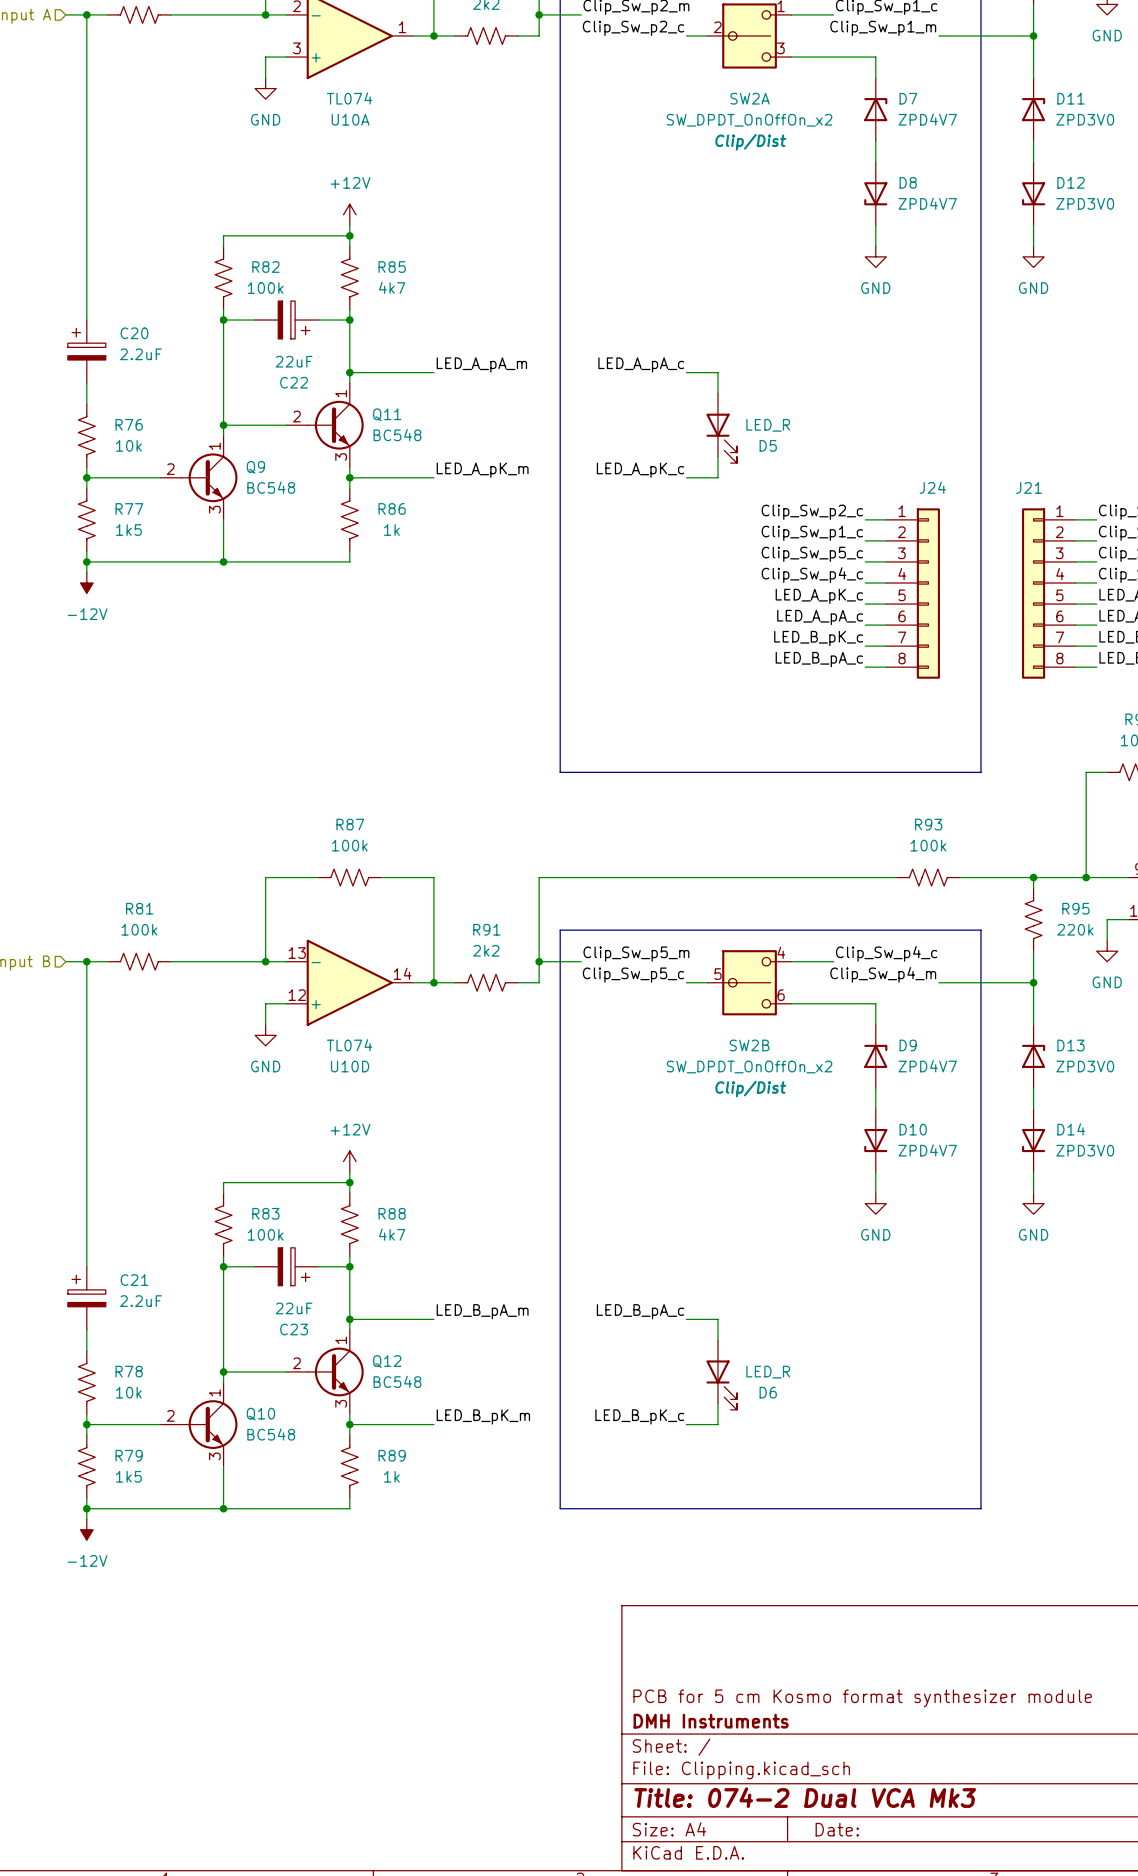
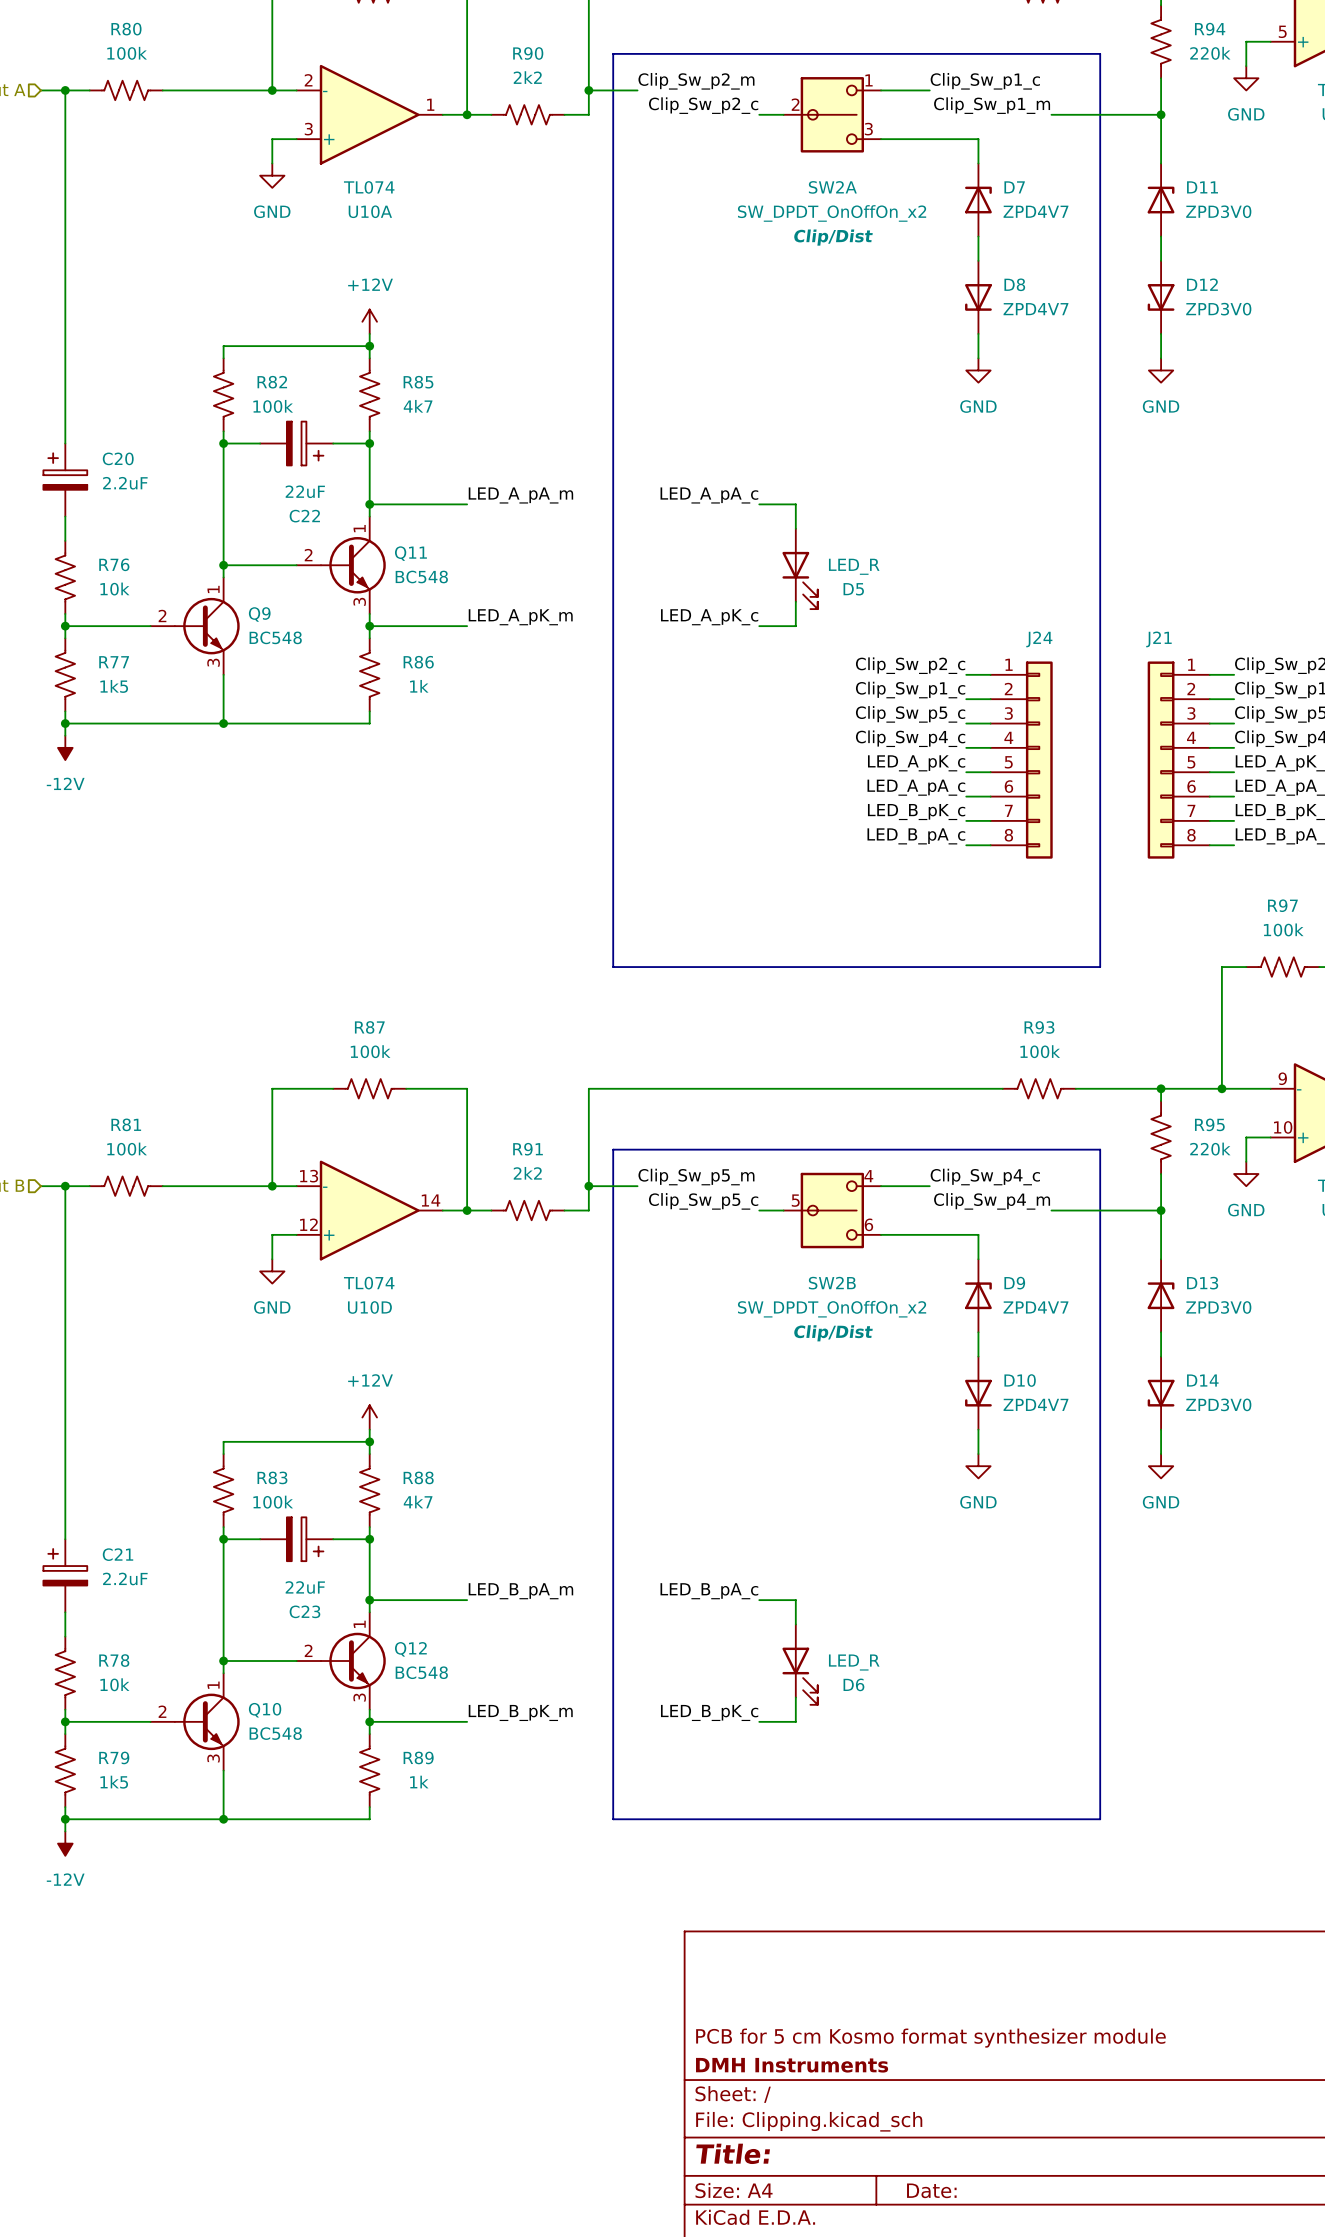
title block: Title: 074-2 Dual VCA Mk3 (805, 1797) -> Title: (733, 2153)

